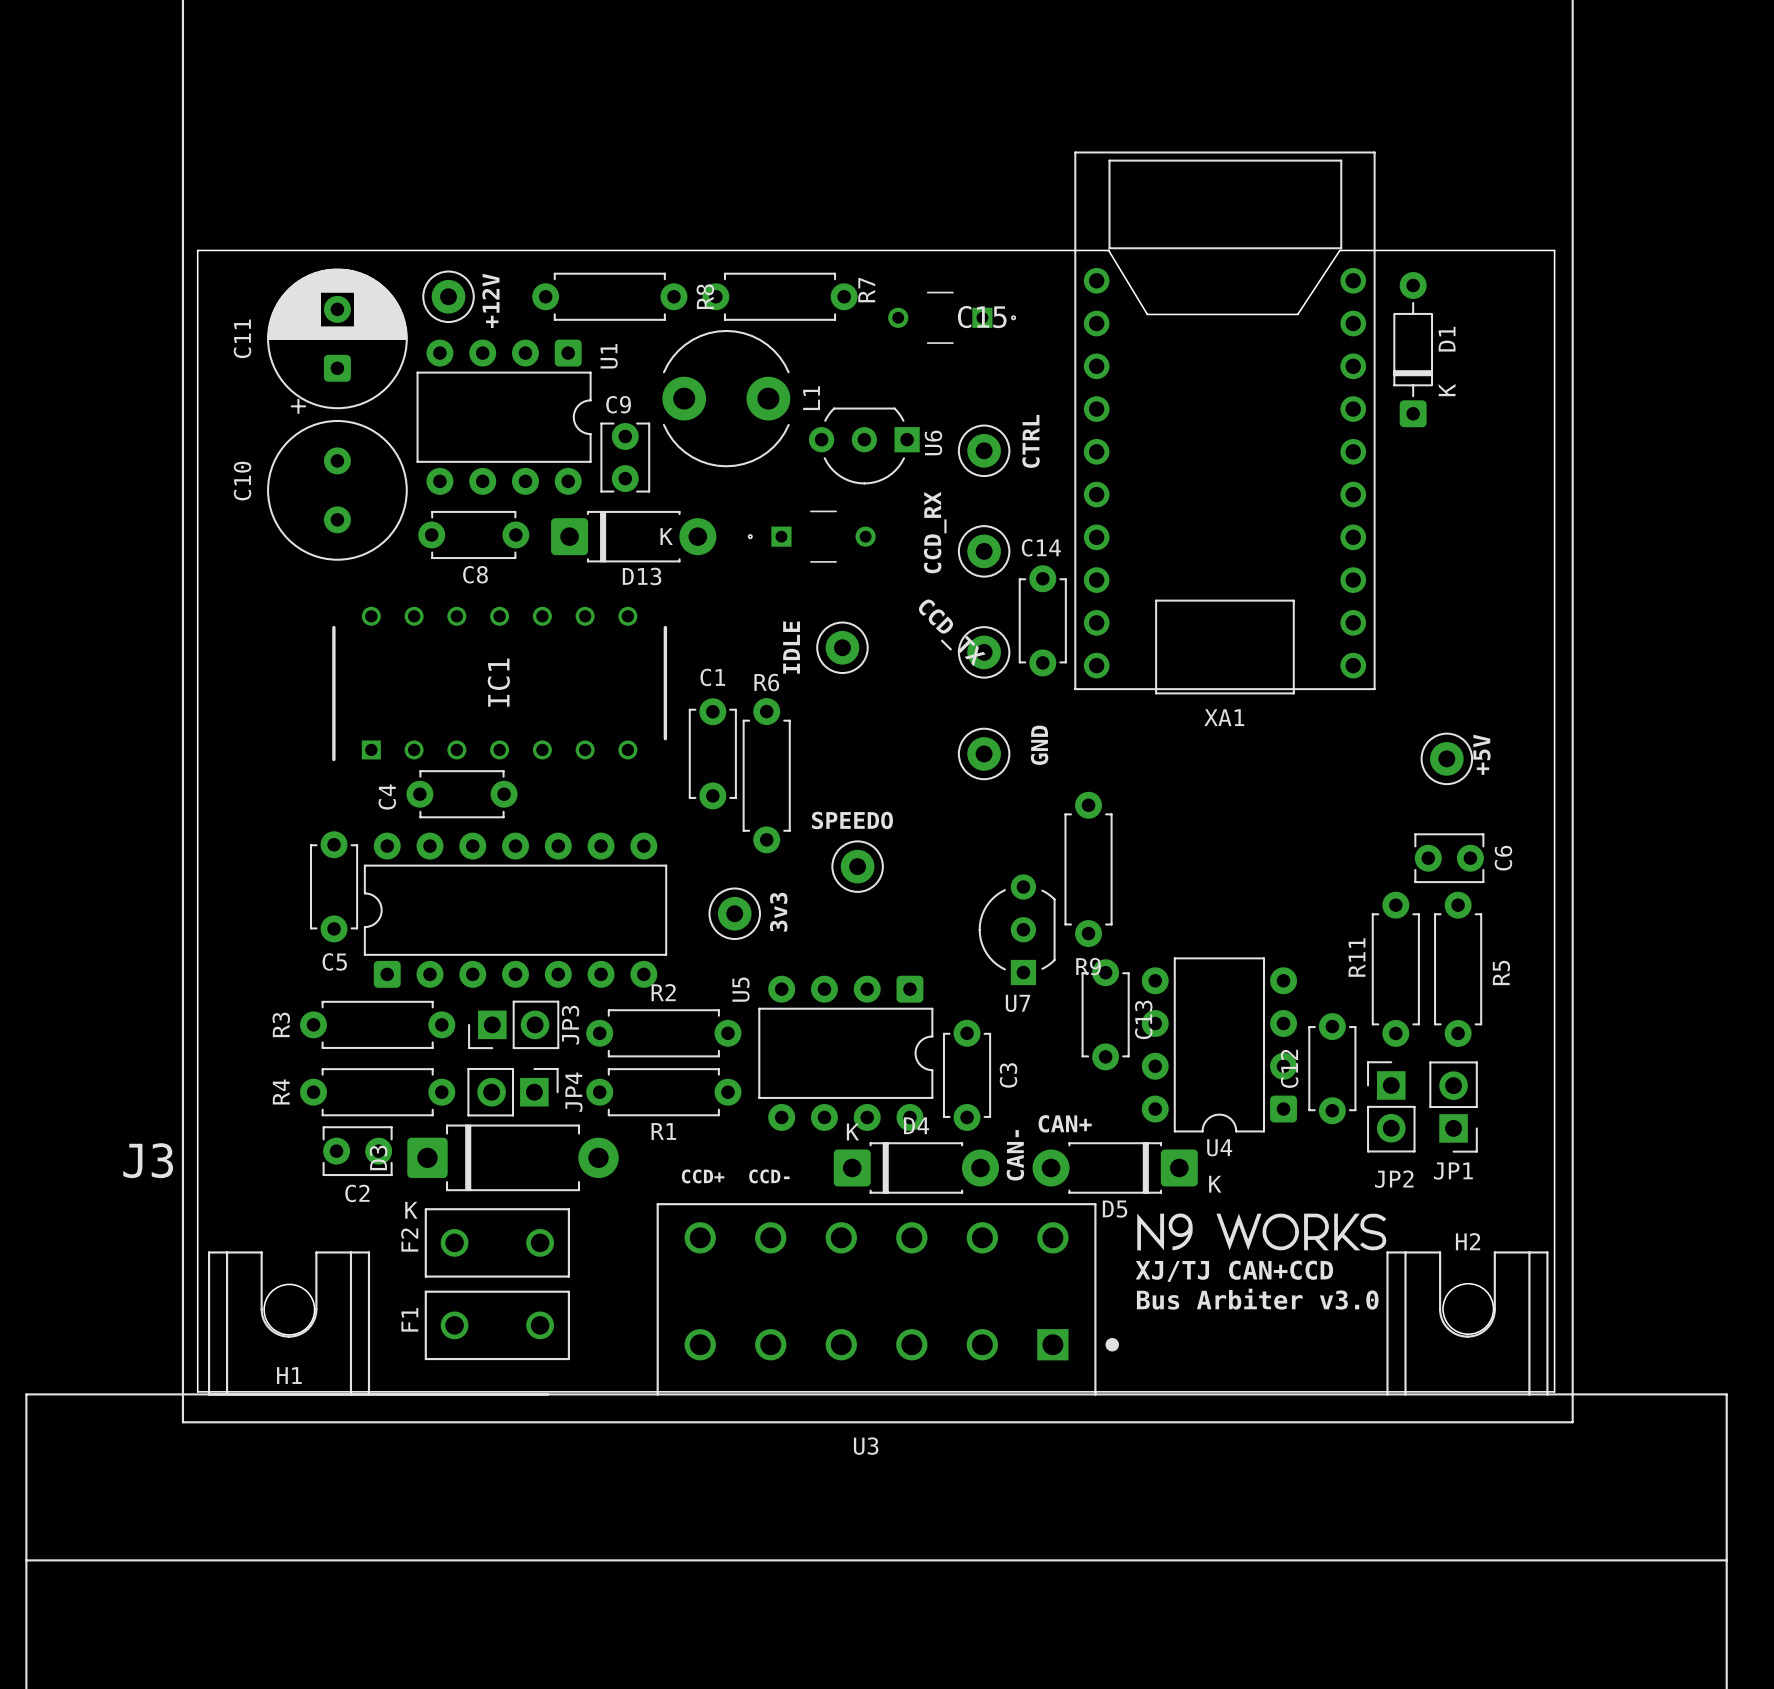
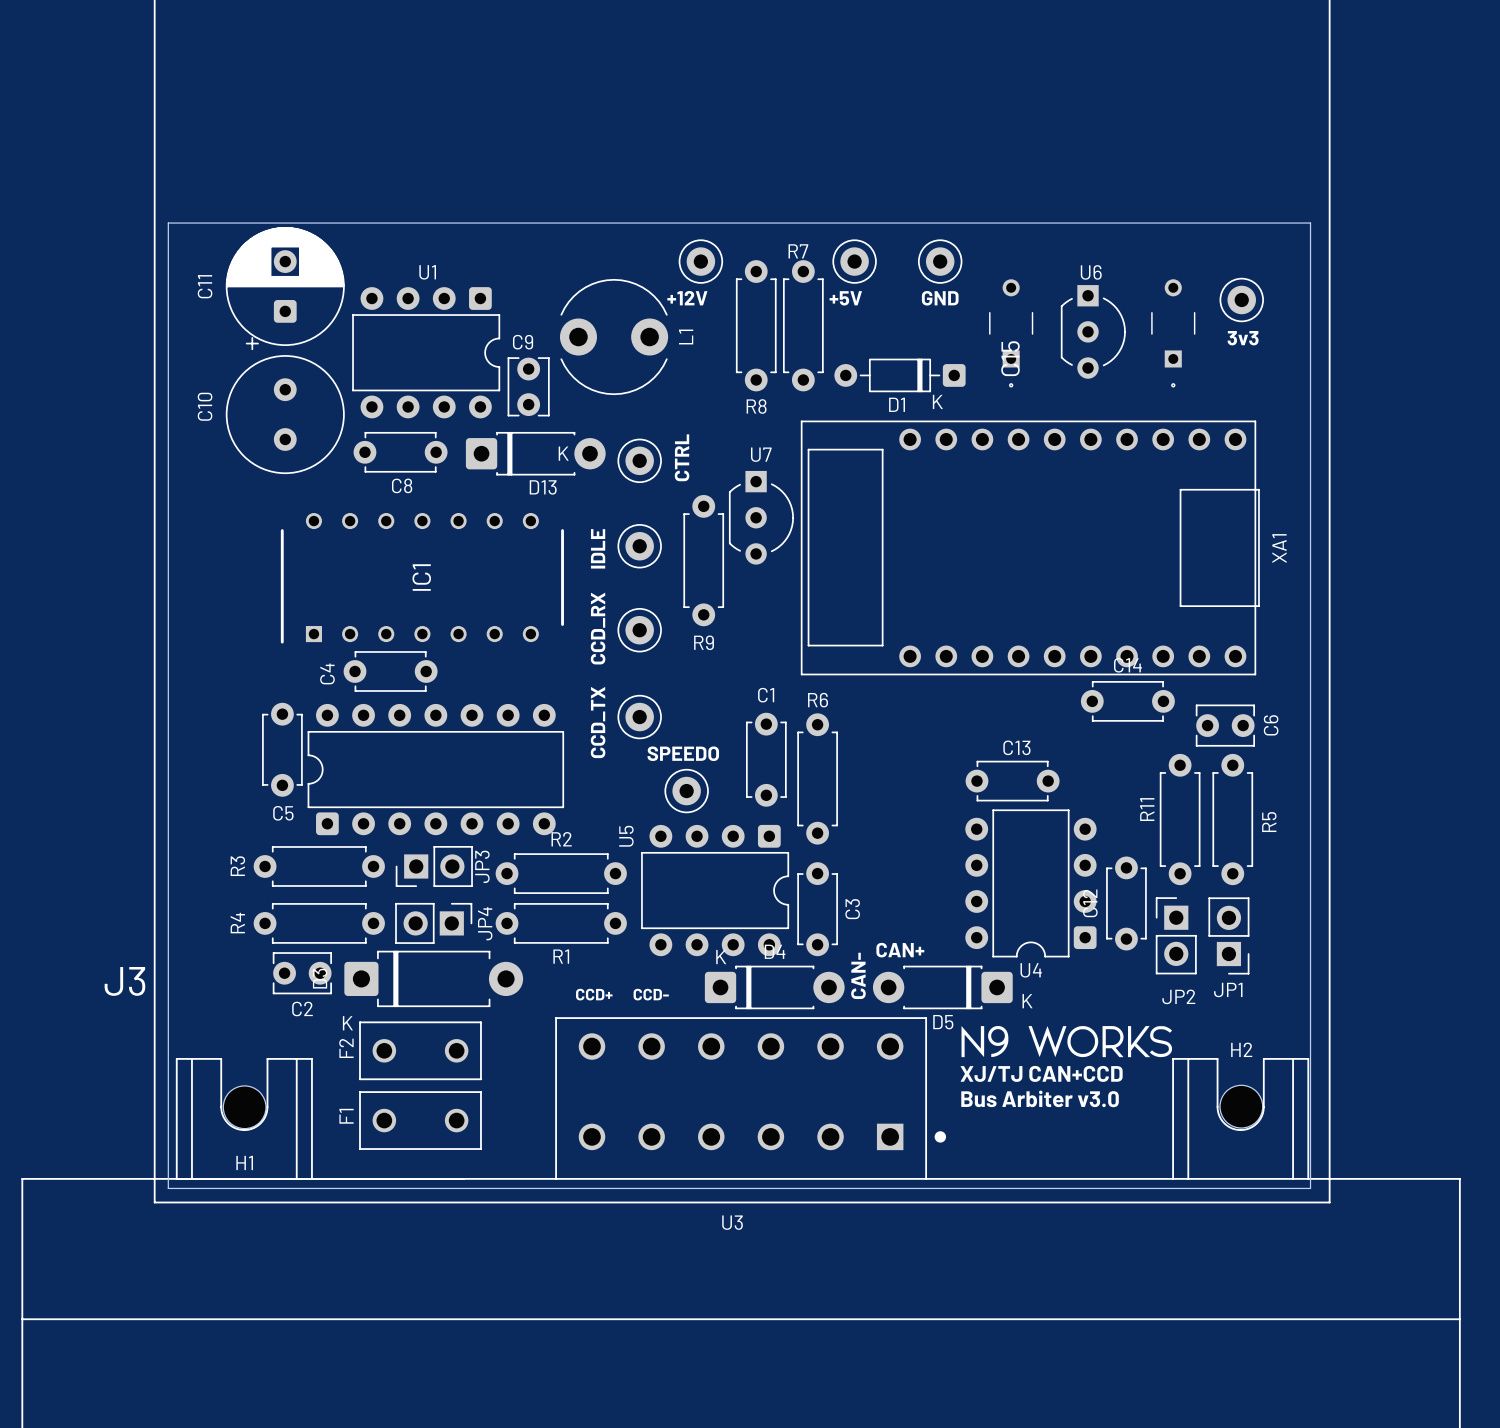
board edge: (197, 250) (1108, 250) (1147, 314) (1297, 314) (1339, 250) (1554, 250) (1554, 1391) (197, 1391) (197, 250) -> (168, 223) (168, 1188) (1310, 1188) (1310, 223) (168, 223)
D1 footprint: [1393, 272, 1434, 428] -> [834, 358, 966, 393]
R7 name position: R7 (866, 290) -> R7 (798, 251)
part: (448, 296) -> none
R8 rotation: 0° (609, 296) -> 90° clockwise (756, 325)
R8 position: (609, 296) -> (756, 325)
R7 rotation: 0° (780, 296) -> 90° clockwise (803, 325)
R7 position: (780, 296) -> (803, 325)
text rotation: 0° (490, 300) -> 90° clockwise (687, 298)
text position: +12V (490, 300) -> +12V (687, 298)
part: none -> (700, 261)
part: none -> (854, 261)
part: none -> (940, 261)
C15 rotation: 0° (952, 317) -> 90° clockwise (1011, 333)
C15 position: (952, 317) -> (1011, 333)
D1 name position: D1 (1447, 339) -> D1 (897, 404)
text: none -> +5V (845, 298)
part: none -> (1241, 300)
U1 name rotation: 0° (609, 356) -> 90° clockwise (427, 272)
U1 name position: U1 (609, 356) -> U1 (427, 272)
part: none -> (1173, 333)
text: none -> 3v3 (1243, 338)
XA1 rotation: 0° (1224, 422) -> 90° counterclockwise (1030, 547)
text position: CTRL (1031, 441) -> CTRL (682, 457)
U6 rotation: 0° (864, 446) -> 90° counterclockwise (1093, 331)
U6 position: (864, 446) -> (1093, 331)
part: (984, 450) -> none
text position: CCD_RX (935, 532) -> CCD_RX (598, 628)
part: (811, 536) -> none
part: none -> (639, 460)
part: (984, 551) -> none
C14 rotation: 0° (1042, 620) -> 90° clockwise (1127, 701)
C14 position: (1042, 620) -> (1127, 701)
text rotation: 0° (952, 632) -> 135° counterclockwise (598, 722)
text position: CCD_TX (952, 632) -> CCD_TX (598, 722)
part: none -> (639, 546)
text position: IDLE (791, 647) -> IDLE (598, 548)
part: (842, 647) -> none
part: (984, 652) -> none
part: none -> (639, 630)
text rotation: 0° (1039, 745) -> 90° clockwise (940, 298)
text position: GND (1039, 745) -> GND (940, 298)
C1 position: (712, 753) -> (766, 759)
part: (984, 753) -> none
text: +5V (1481, 754) -> none
part: (1446, 758) -> none
R6 position: (766, 775) -> (817, 778)
text position: SPEEDO (852, 820) -> SPEEDO (683, 753)
part: none -> (639, 717)
part: (857, 866) -> none
R9 position: (1088, 869) -> (703, 560)
text: 3v3 (778, 912) -> none
part: (734, 913) -> none
U7 rotation: 0° (1017, 929) -> 180° (761, 517)
U7 position: (1017, 929) -> (761, 517)
part: none -> (686, 791)
C13 rotation: 0° (1105, 1014) -> 90° clockwise (1012, 781)
C13 position: (1105, 1014) -> (1012, 781)
C13 name position: C13 (1143, 1019) -> C13 (1016, 747)

